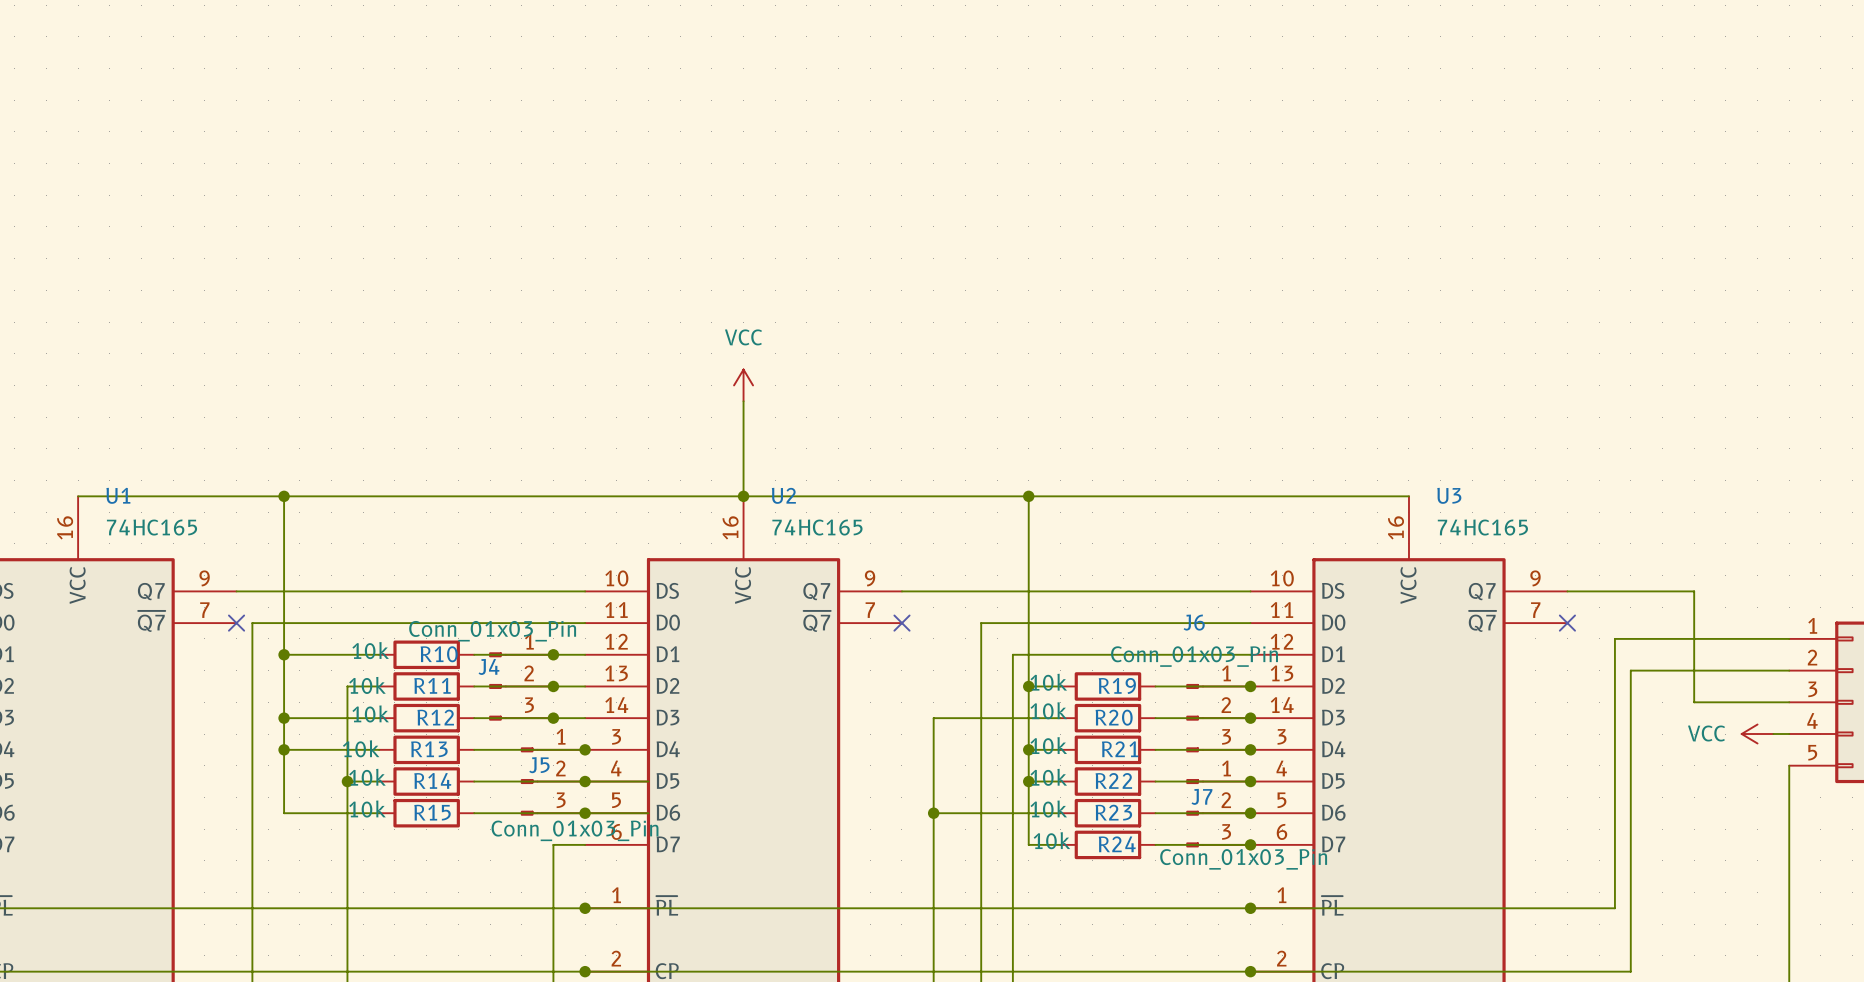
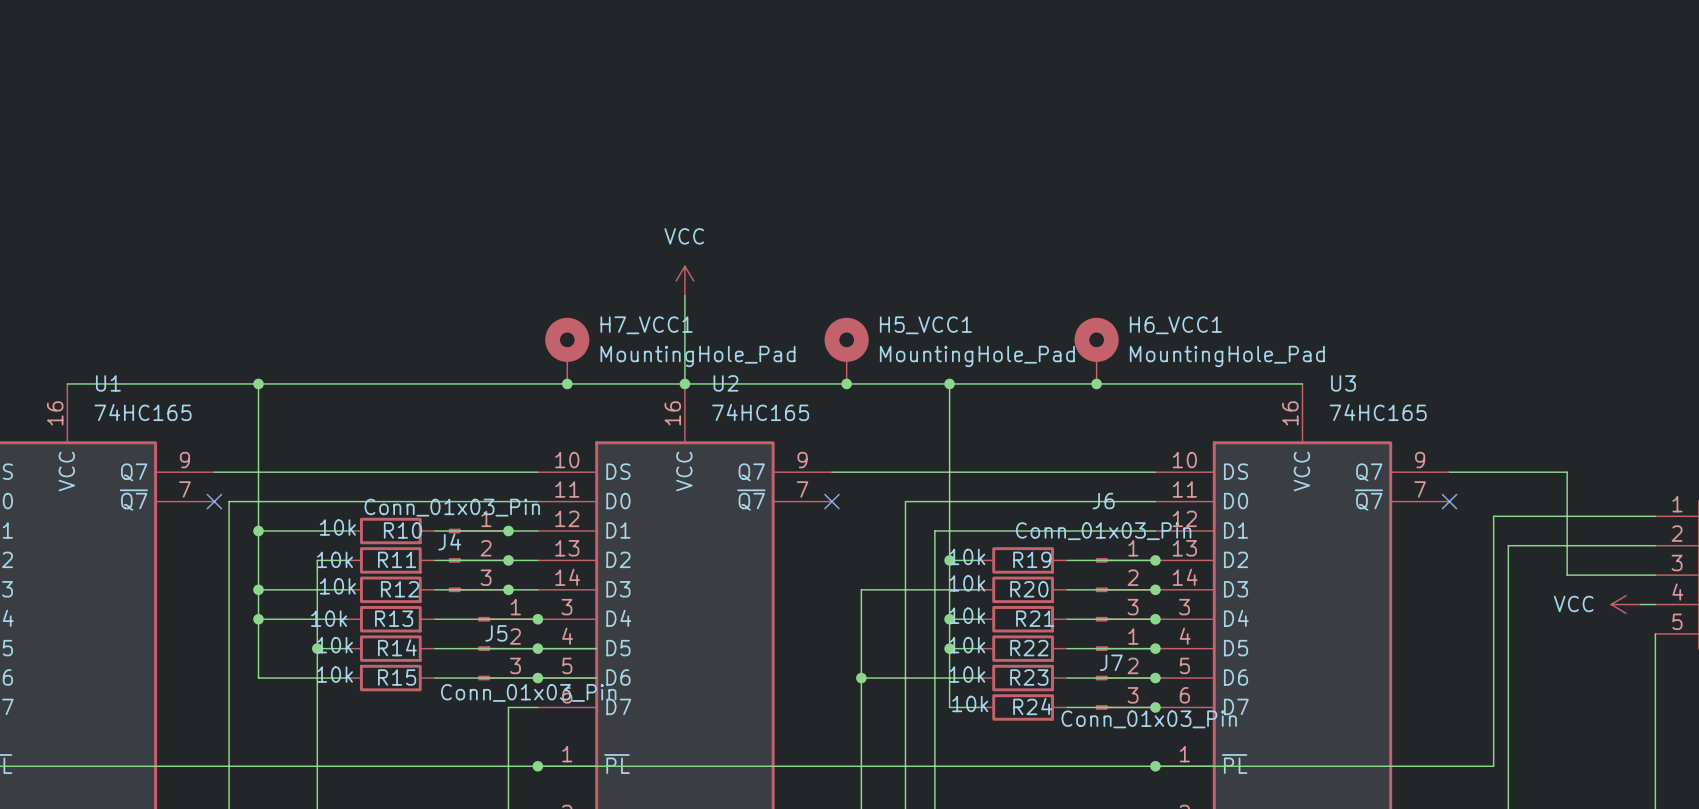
H7_VCC1: none -> MountingHole_Pad (567, 350)
H5_VCC1: none -> MountingHole_Pad (846, 350)
H6_VCC1: none -> MountingHole_Pad (1096, 350)
junction: none -> (567, 383)
junction: none -> (846, 383)
junction: none -> (1096, 383)

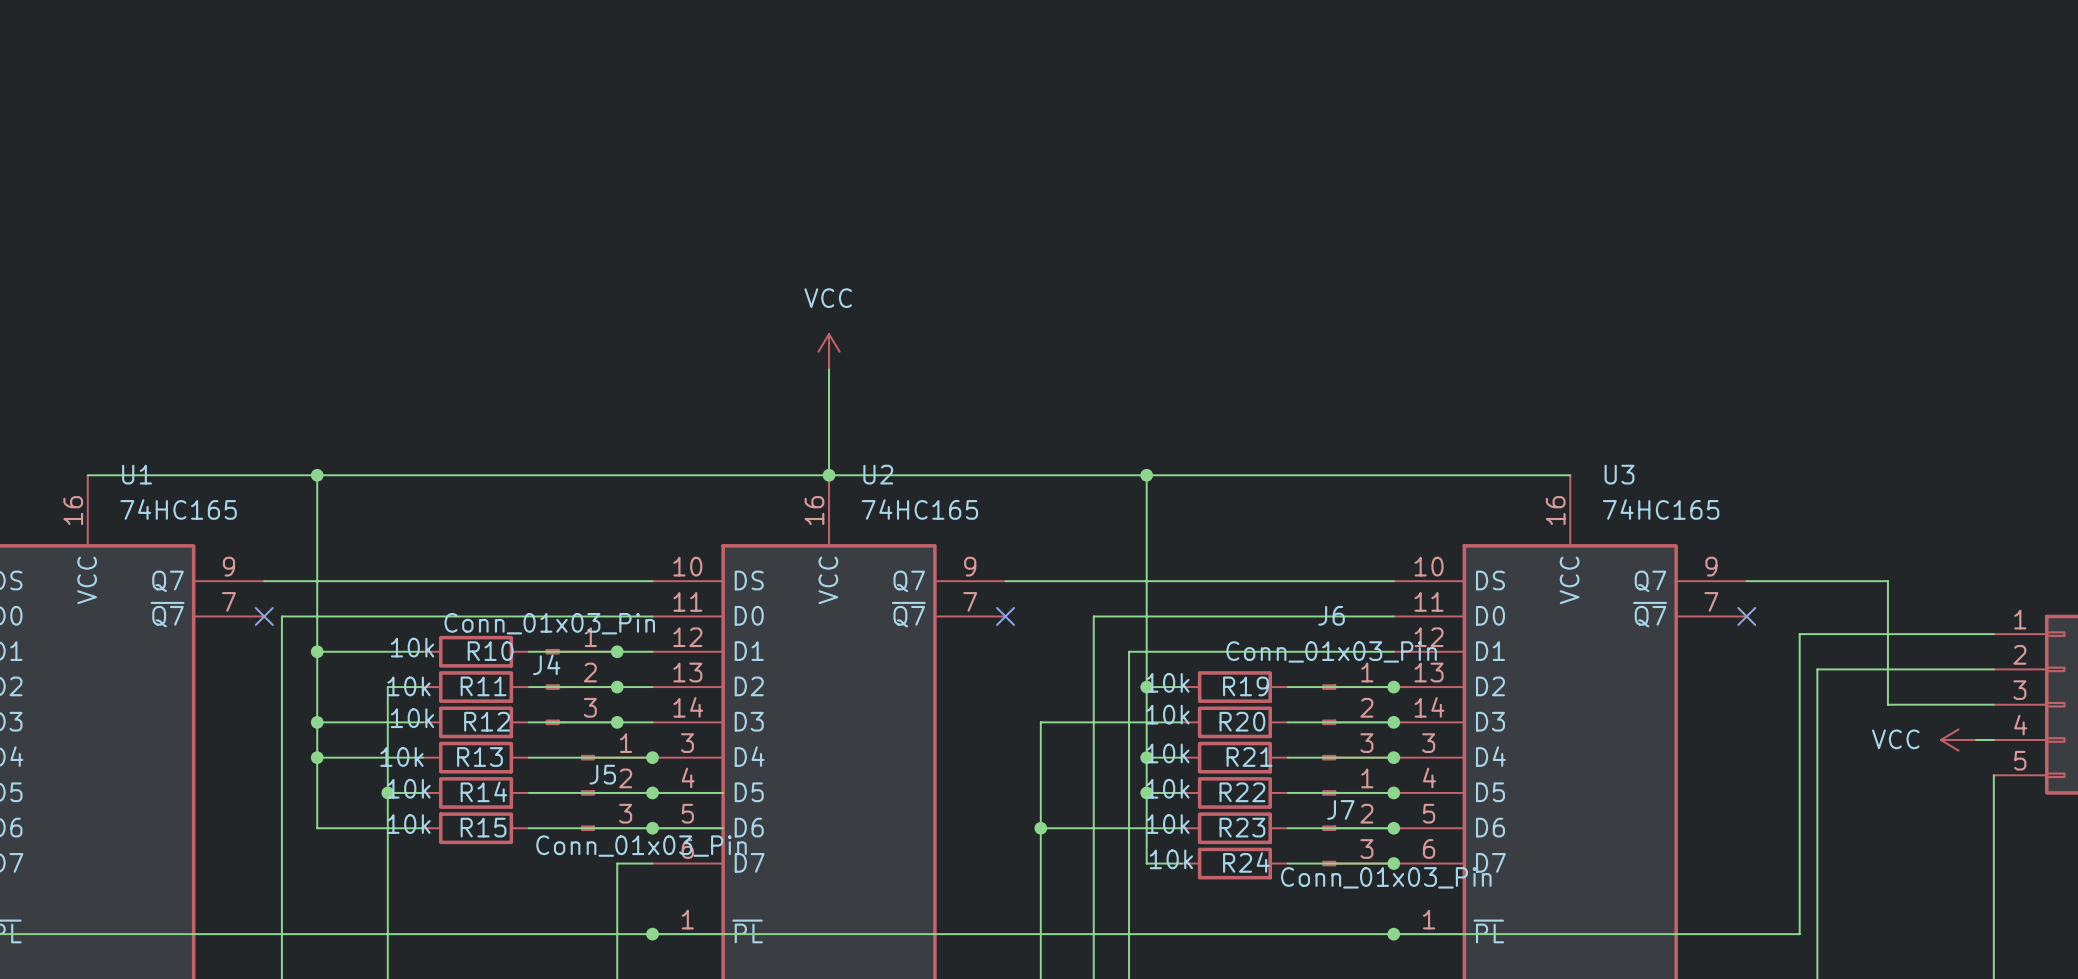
H7_VCC1: MountingHole_Pad (567, 350) -> none
H5_VCC1: MountingHole_Pad (846, 350) -> none
H6_VCC1: MountingHole_Pad (1096, 350) -> none
junction: (567, 383) -> none
junction: (846, 383) -> none
junction: (1096, 383) -> none

